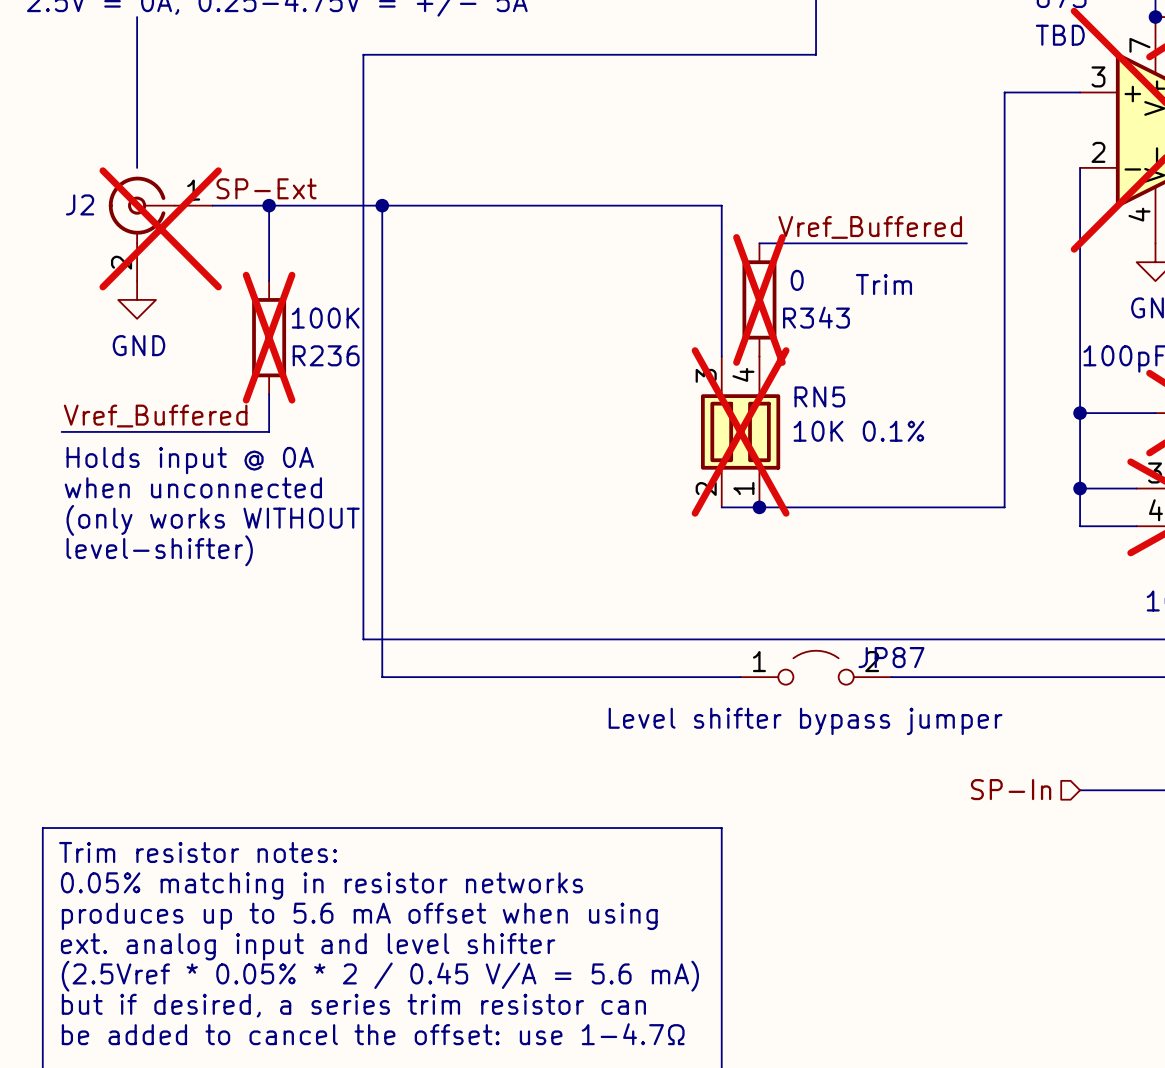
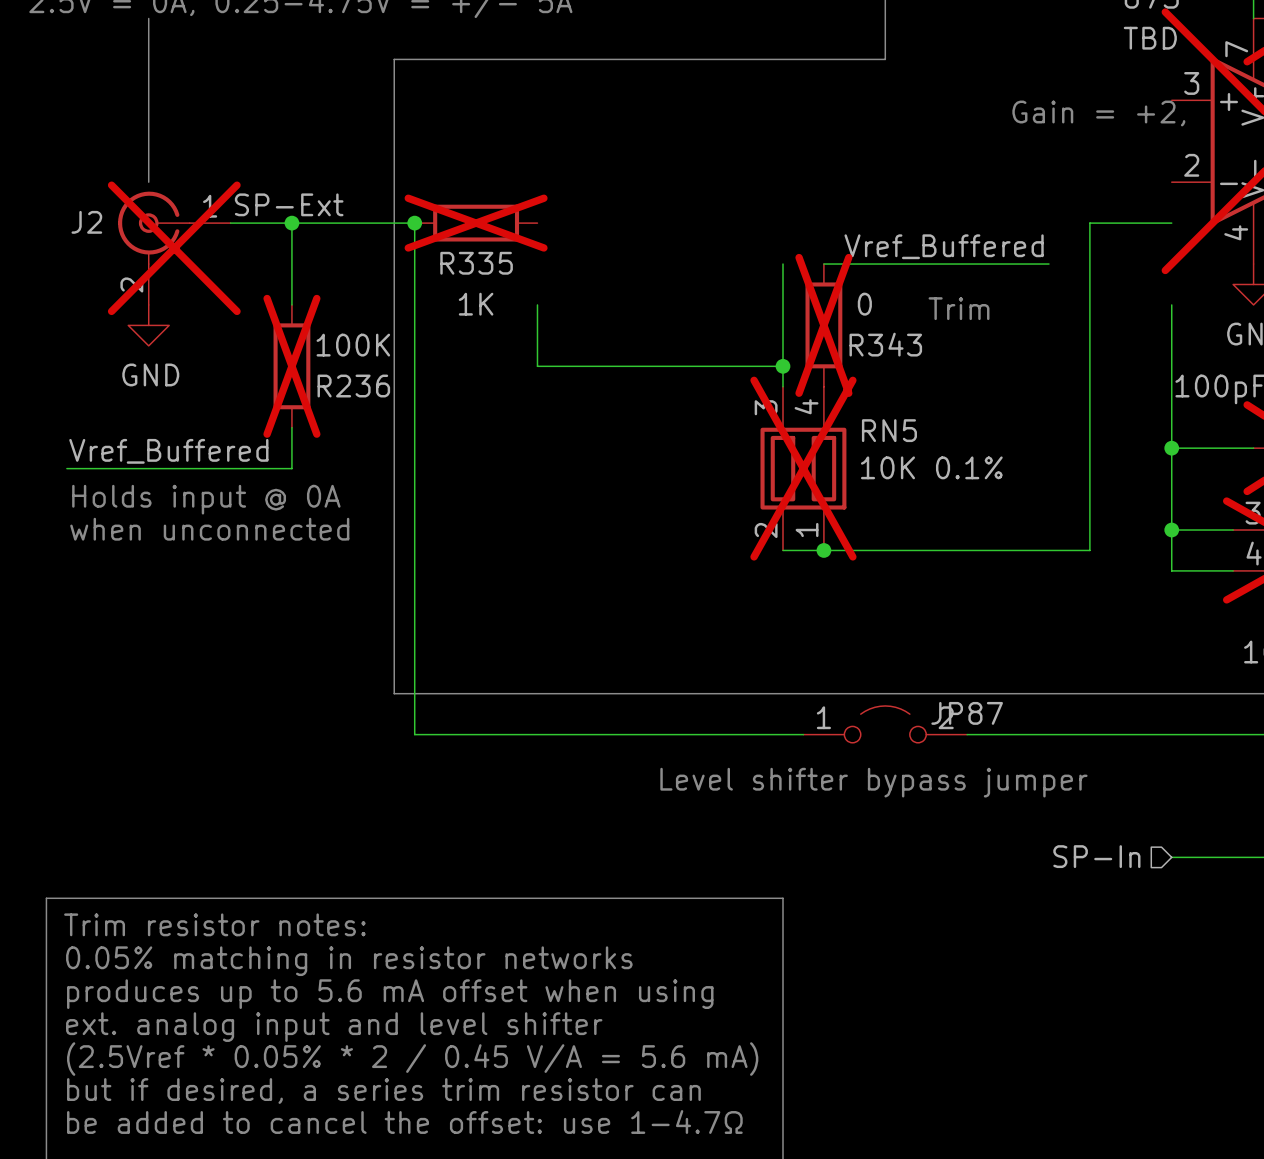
junction: (1155, 17) -> none
wire: (1080, 92) (1004, 92) (1004, 205) -> (1171, 223) (1089, 223)
text: none -> Gain = +2, (1098, 113)
wire: (1080, 167) (1080, 281) -> none
wire: (382, 205) (721, 205) (721, 243) -> none
R335: none -> 1K (476, 223)
wire: none -> (537, 304) (537, 366) (782, 366)
junction: none -> (782, 366)
text: (only works WITHOUT (213, 520) -> none
text: level-shifter) (159, 550) -> none

